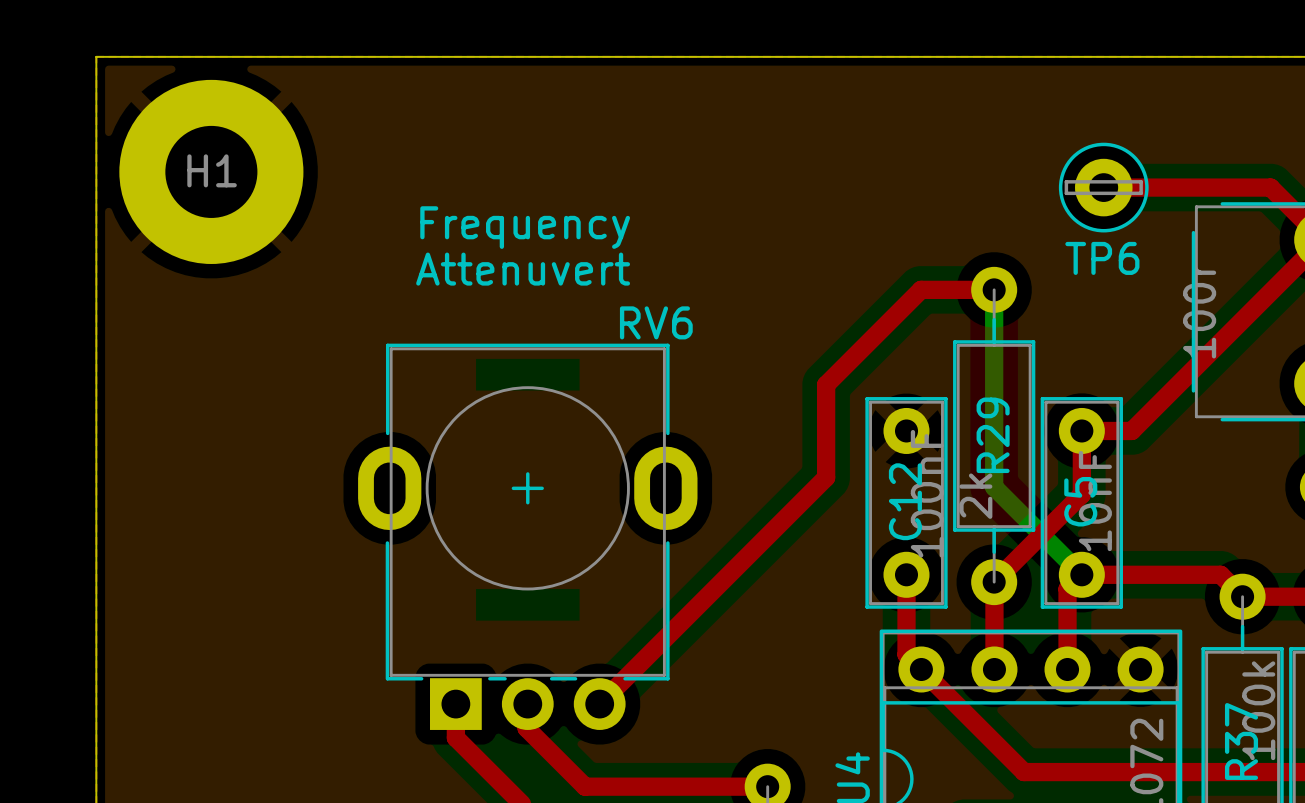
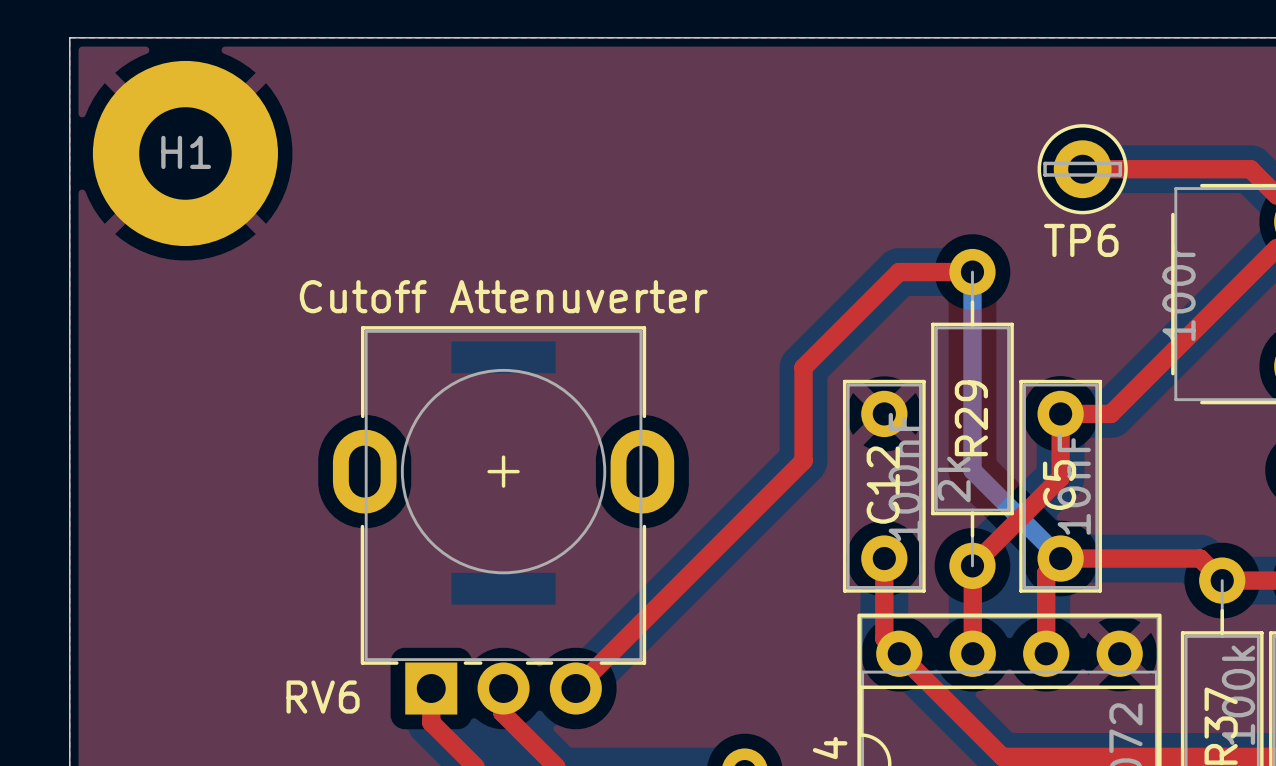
text: Frequency (525, 227) -> none
text: Attenuvert (523, 269) -> none
RV6 text: none -> Cutoff Attenuverter (503, 296)
RV6 name position: RV6 (656, 322) -> RV6 (323, 697)

